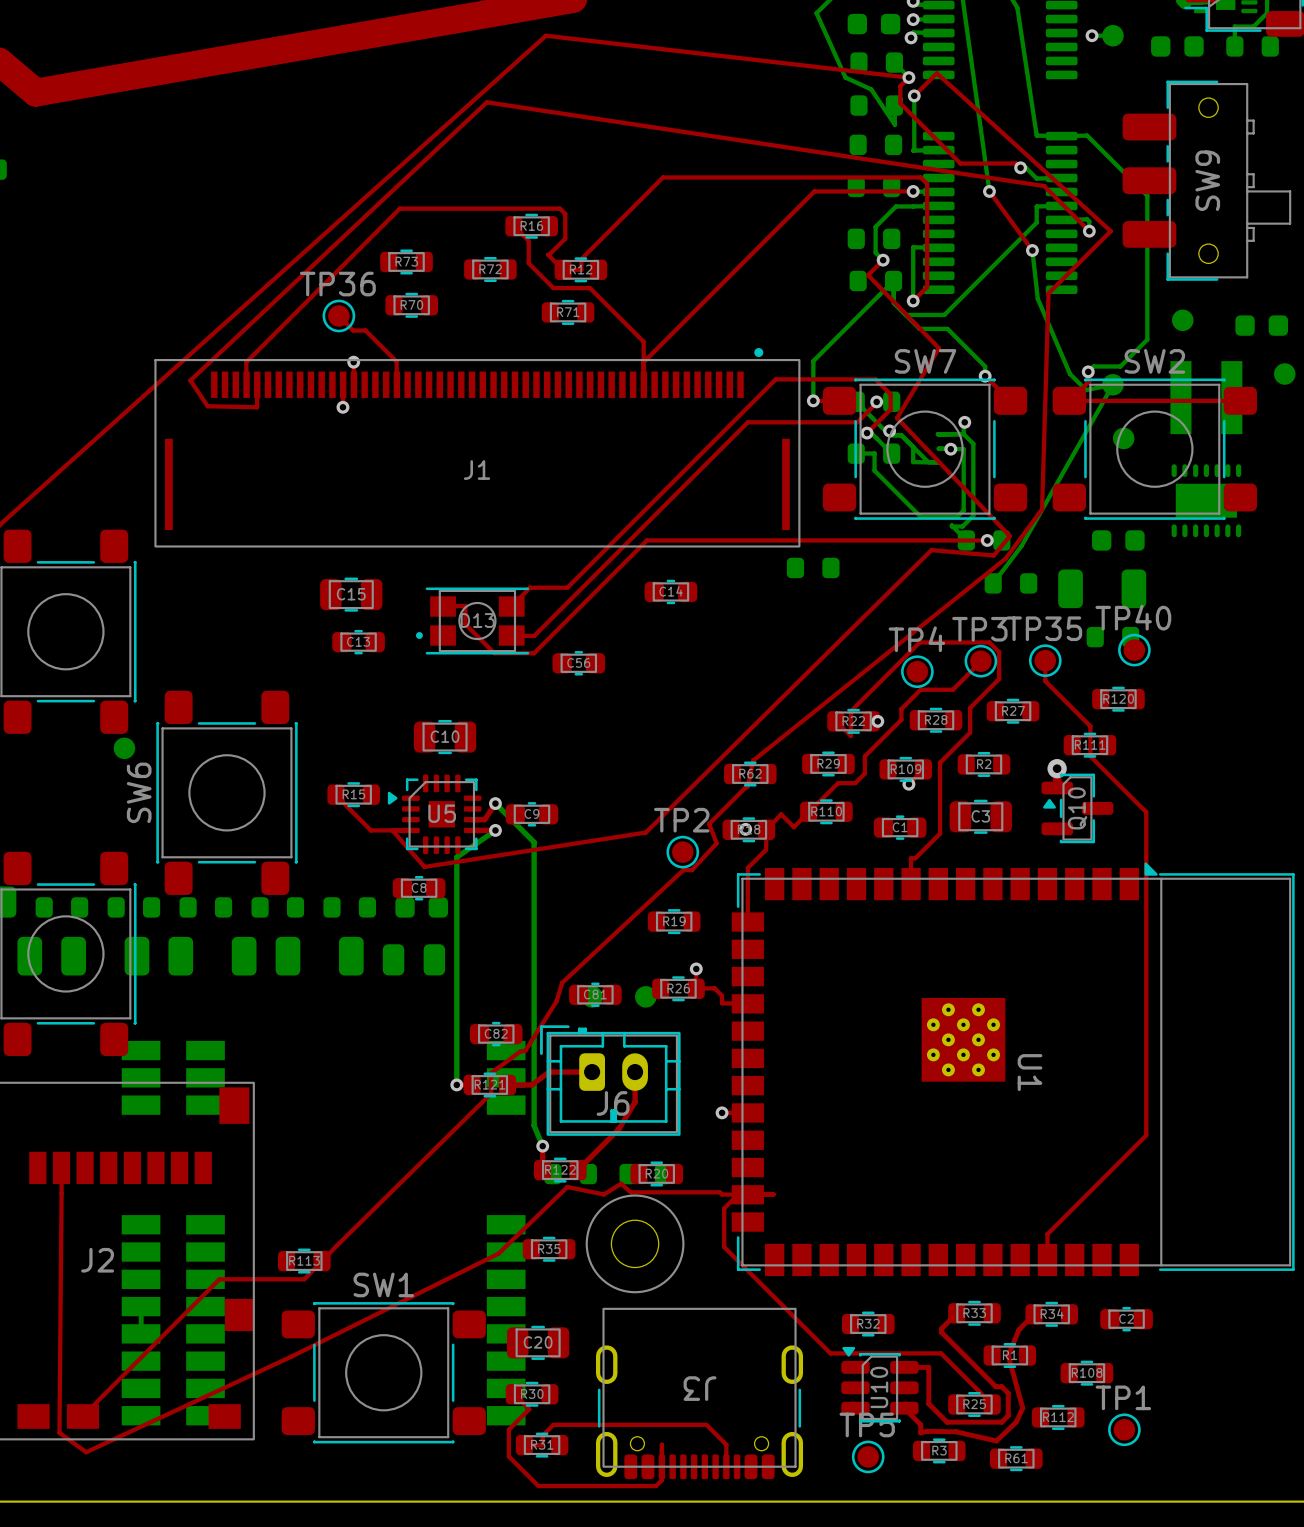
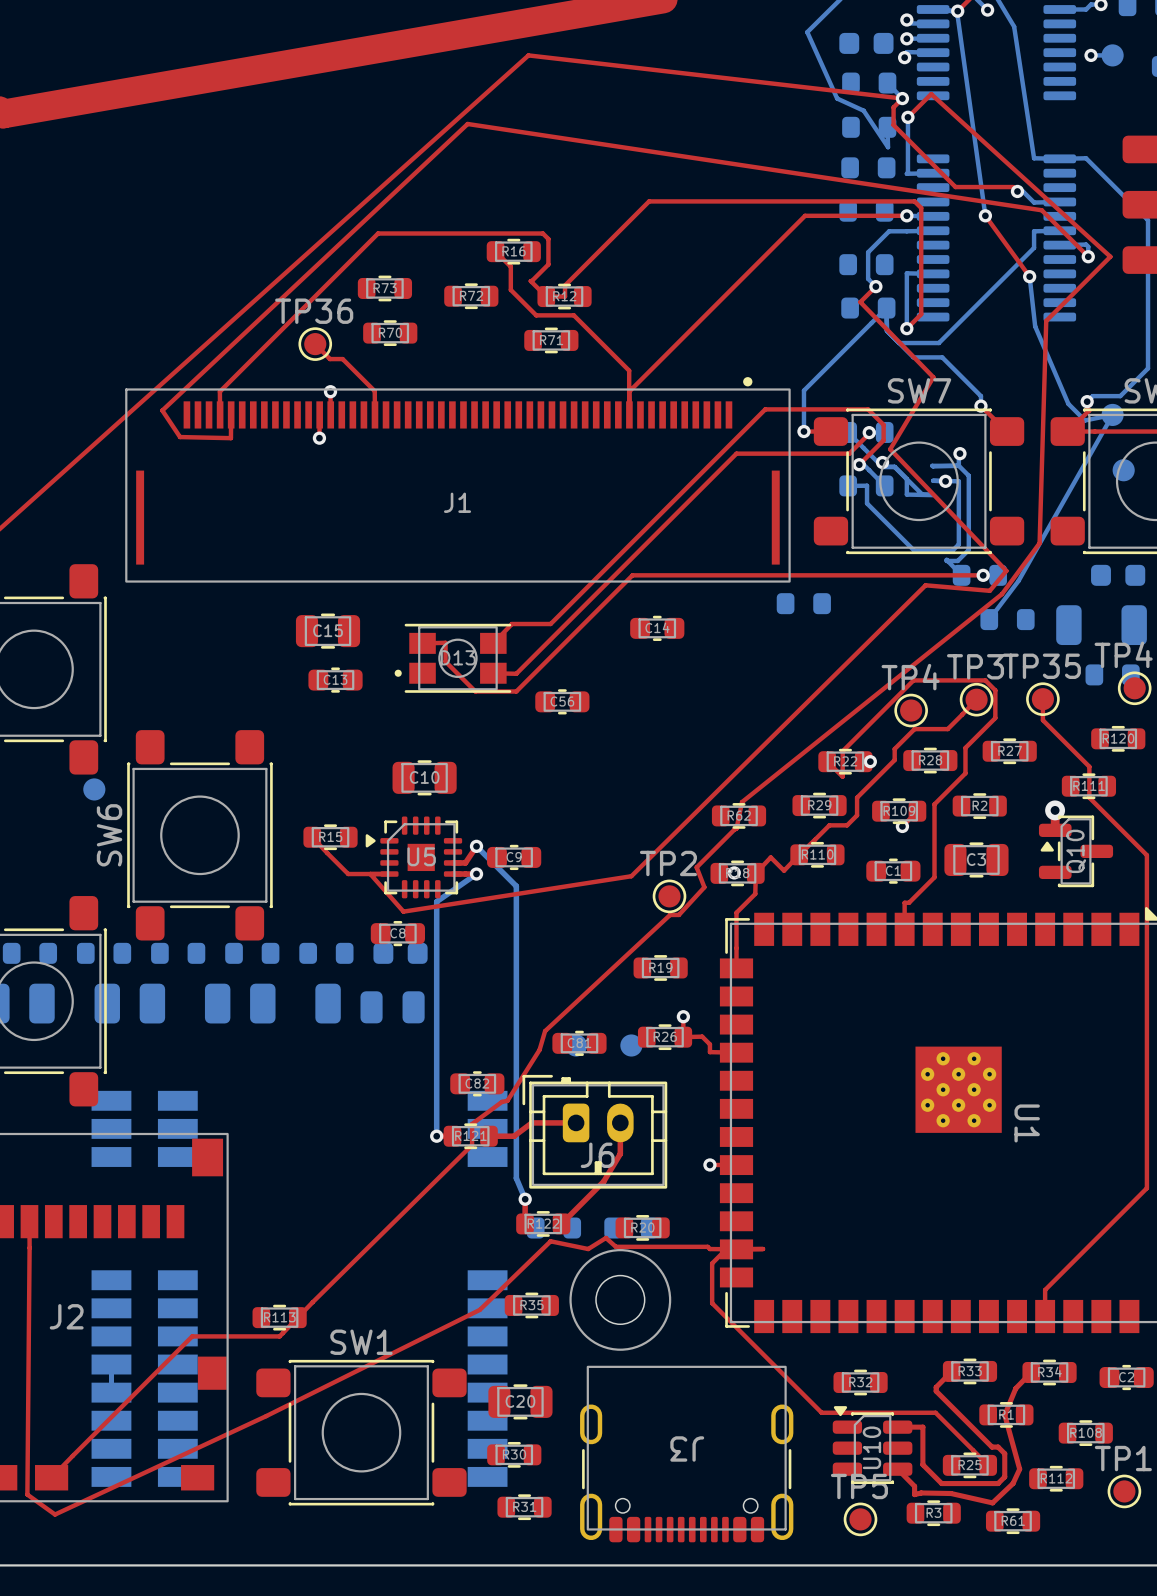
top track: (514, 1394) (529, 1409) (508, 1429) (508, 1456) (538, 1486) (656, 1486) (661, 1480) (661, 1444) -> none
top track: (524, 1445) (542, 1445) (542, 1435) (553, 1424) (706, 1424) (726, 1444) (726, 1466) -> none

